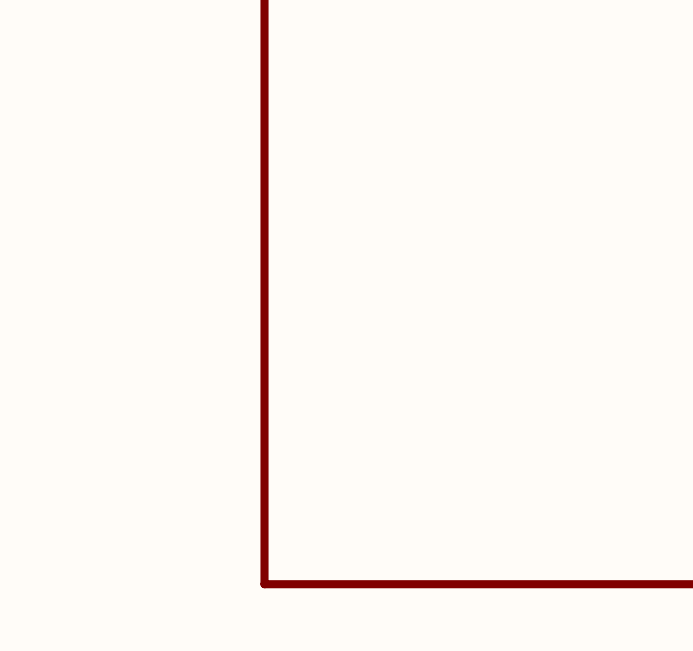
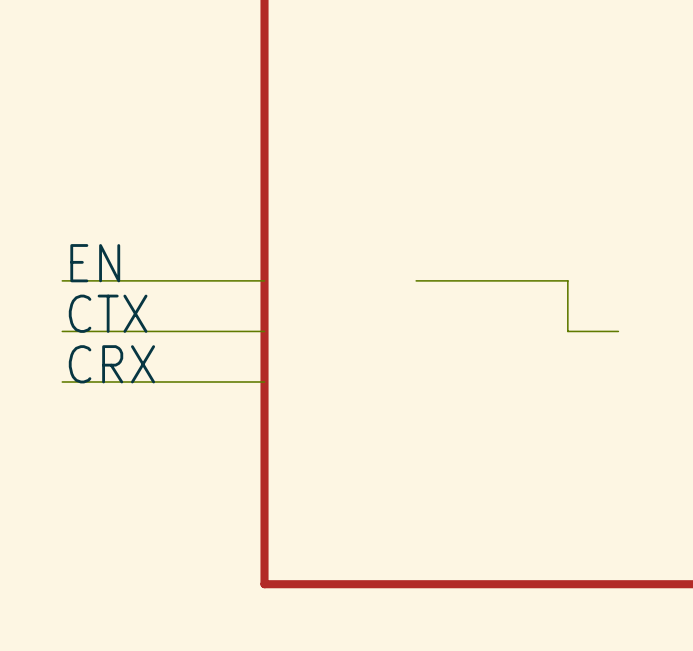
label: none -> EN (95, 263)
wire: none -> (62, 280) (264, 280)
wire: none -> (416, 280) (567, 280) (567, 331) (618, 331)
label: none -> CTX (108, 313)
wire: none -> (62, 331) (264, 331)
label: none -> CRX (111, 364)
wire: none -> (62, 381) (264, 381)

